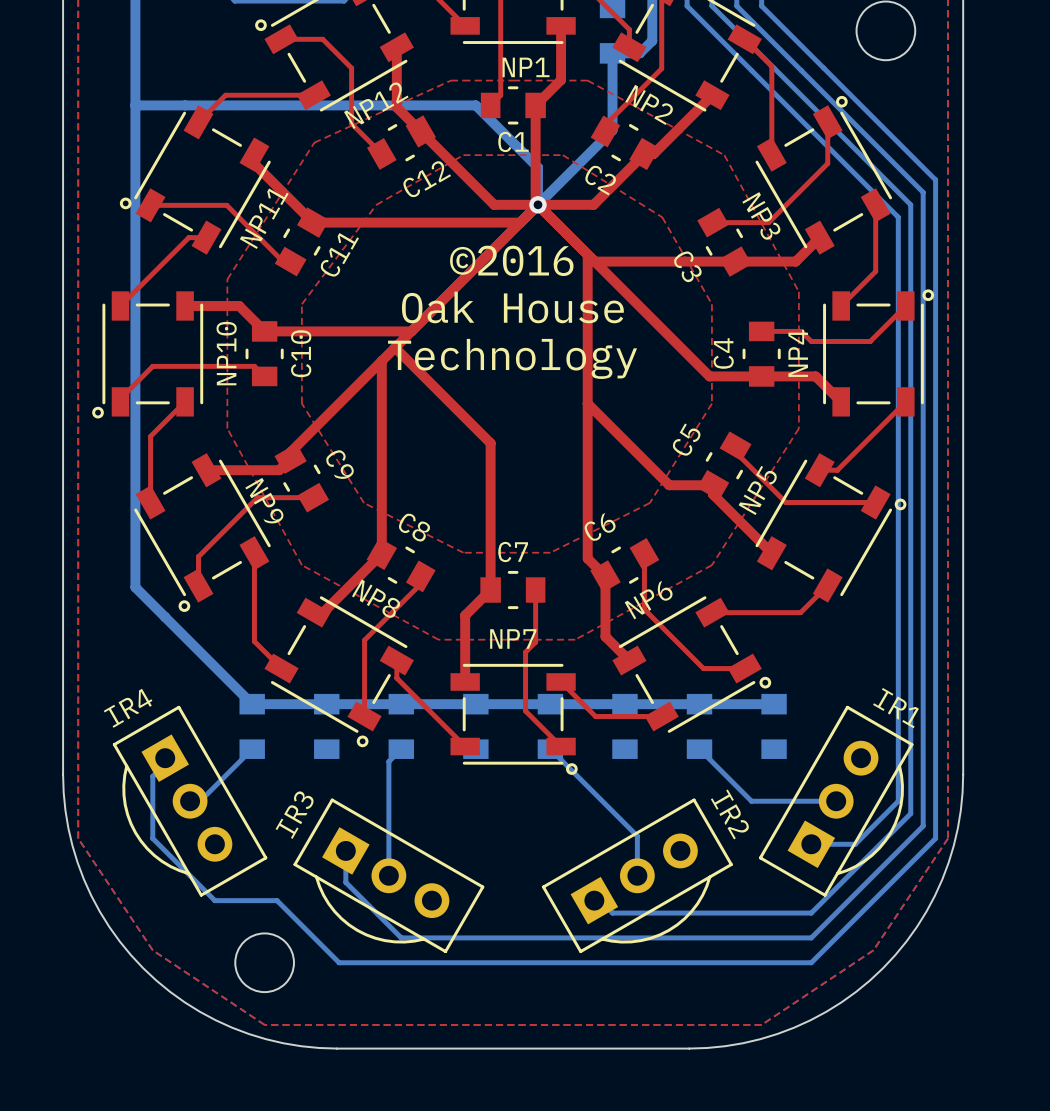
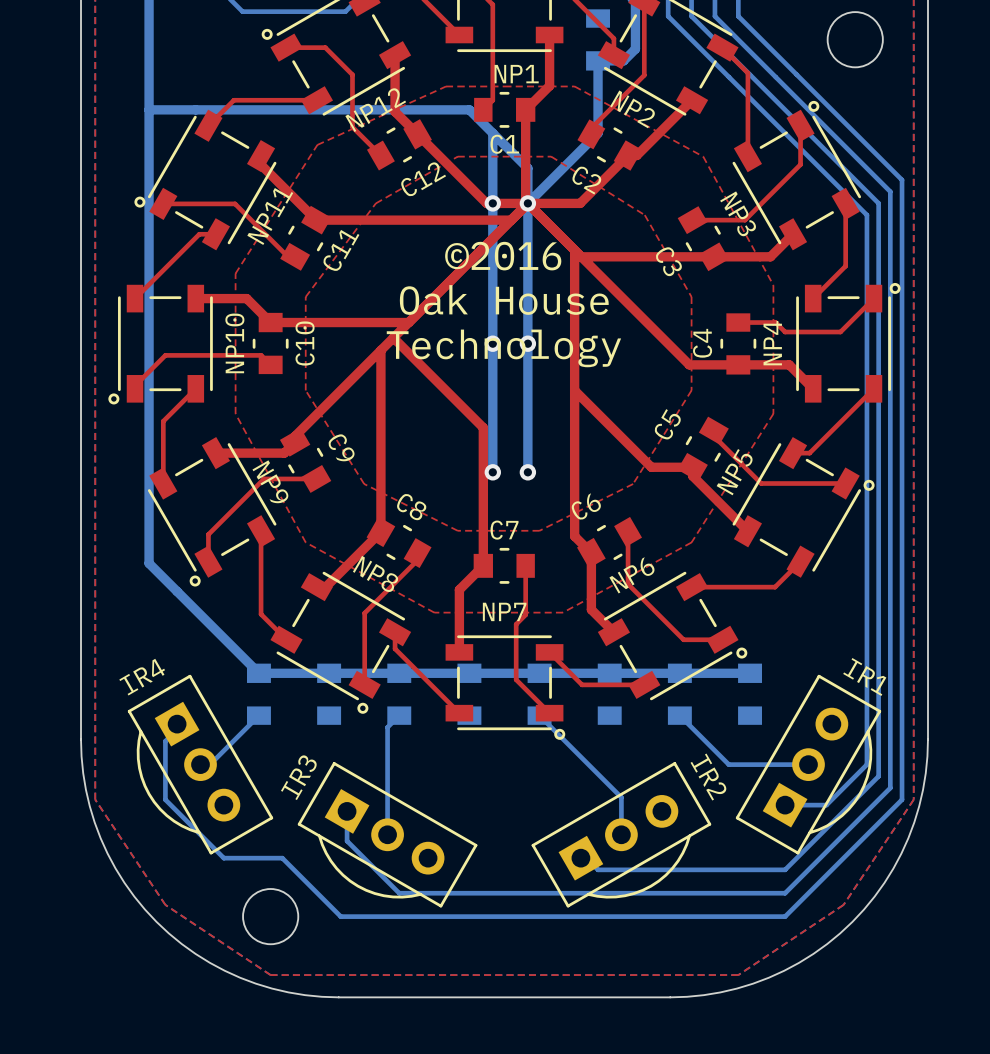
bottom track: none -> (492, 133) (492, 472)
via: none -> (492, 203)
bottom track: none -> (527, 203) (527, 472)
via: none -> (492, 343)
via: none -> (527, 343)
via: none -> (492, 472)
via: none -> (527, 472)

